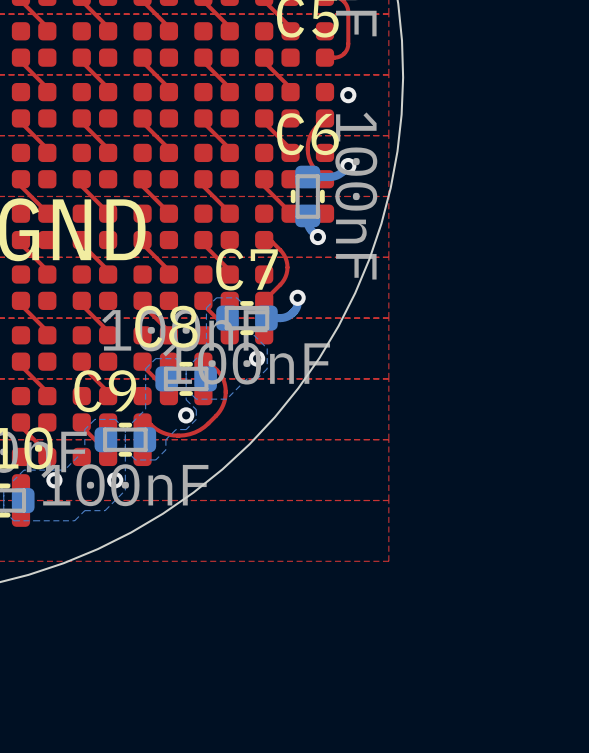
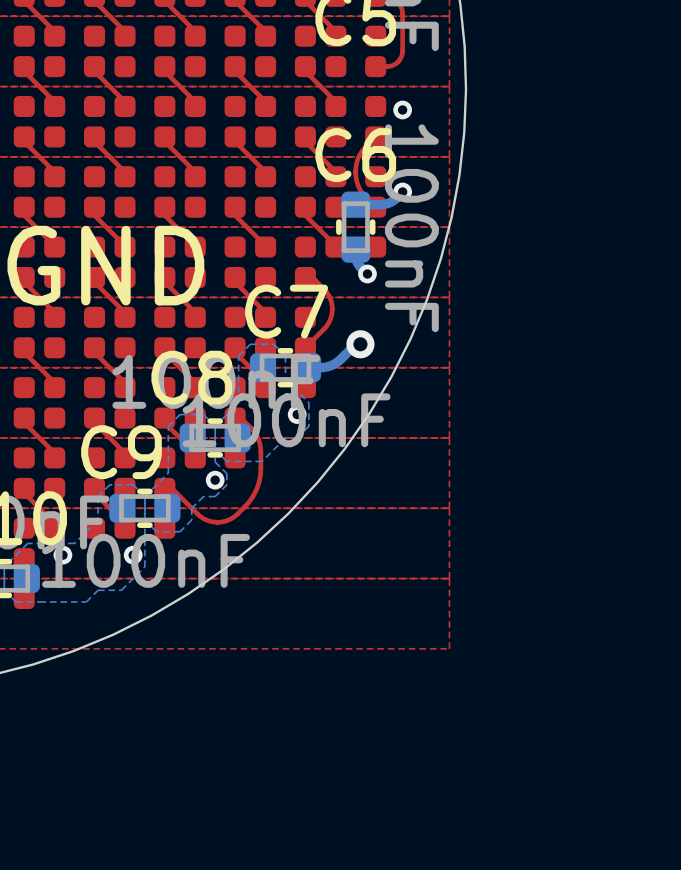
via size: [289, 289, 306, 306] -> [346, 330, 375, 359]
bottom track: (297, 297) (297, 306) (292, 313) (284, 317) (276, 318) -> (360, 344) (354, 345) (334, 363) (320, 367)
top track: (225, 391) (224, 402) (220, 410) (204, 427) (194, 432) (184, 435) (170, 434) (145, 422) -> (260, 452) (259, 478) (254, 493) (245, 506) (228, 520) (217, 522) (203, 518) (172, 489) (168, 488)

